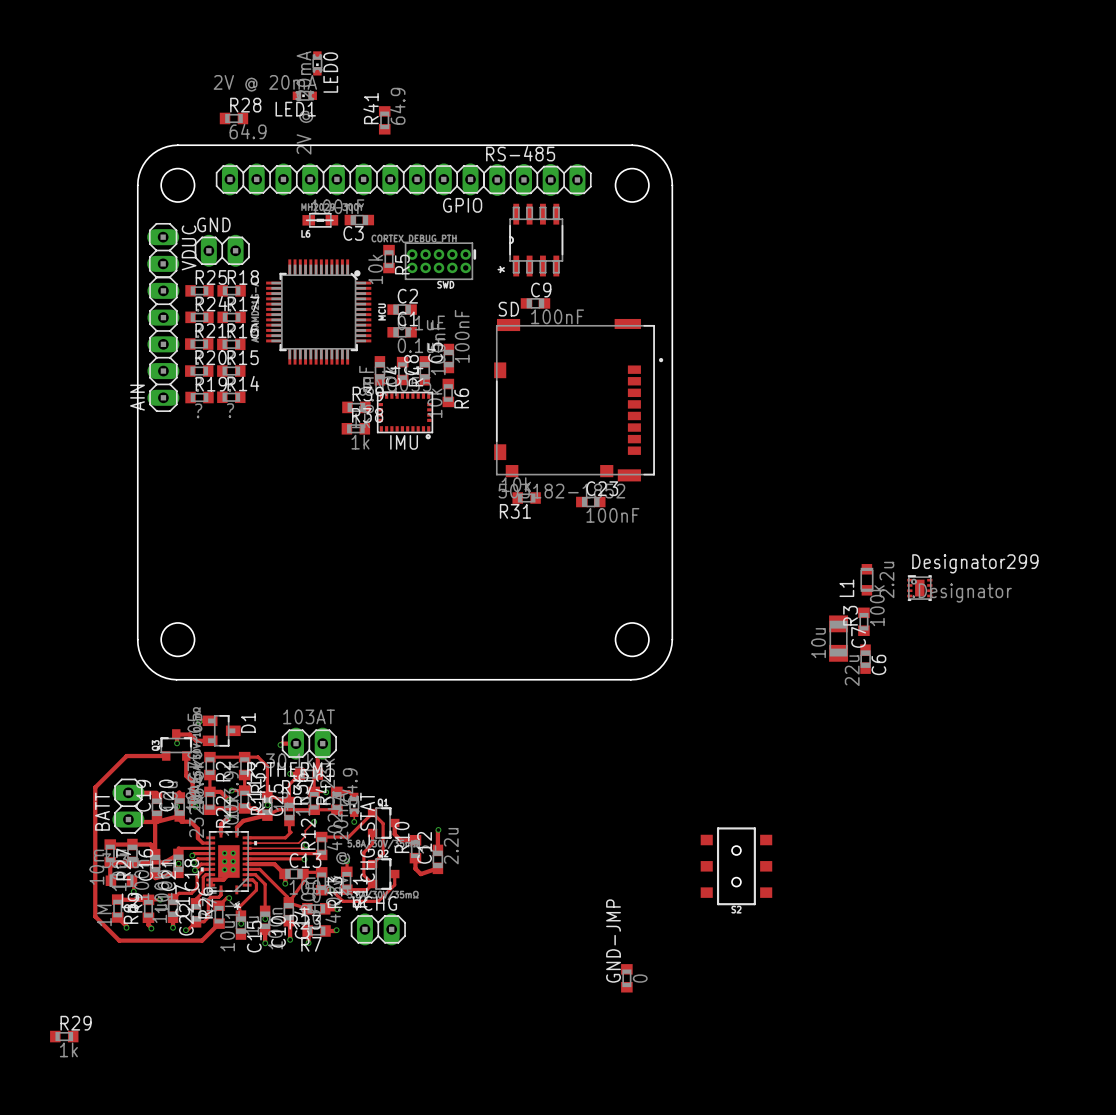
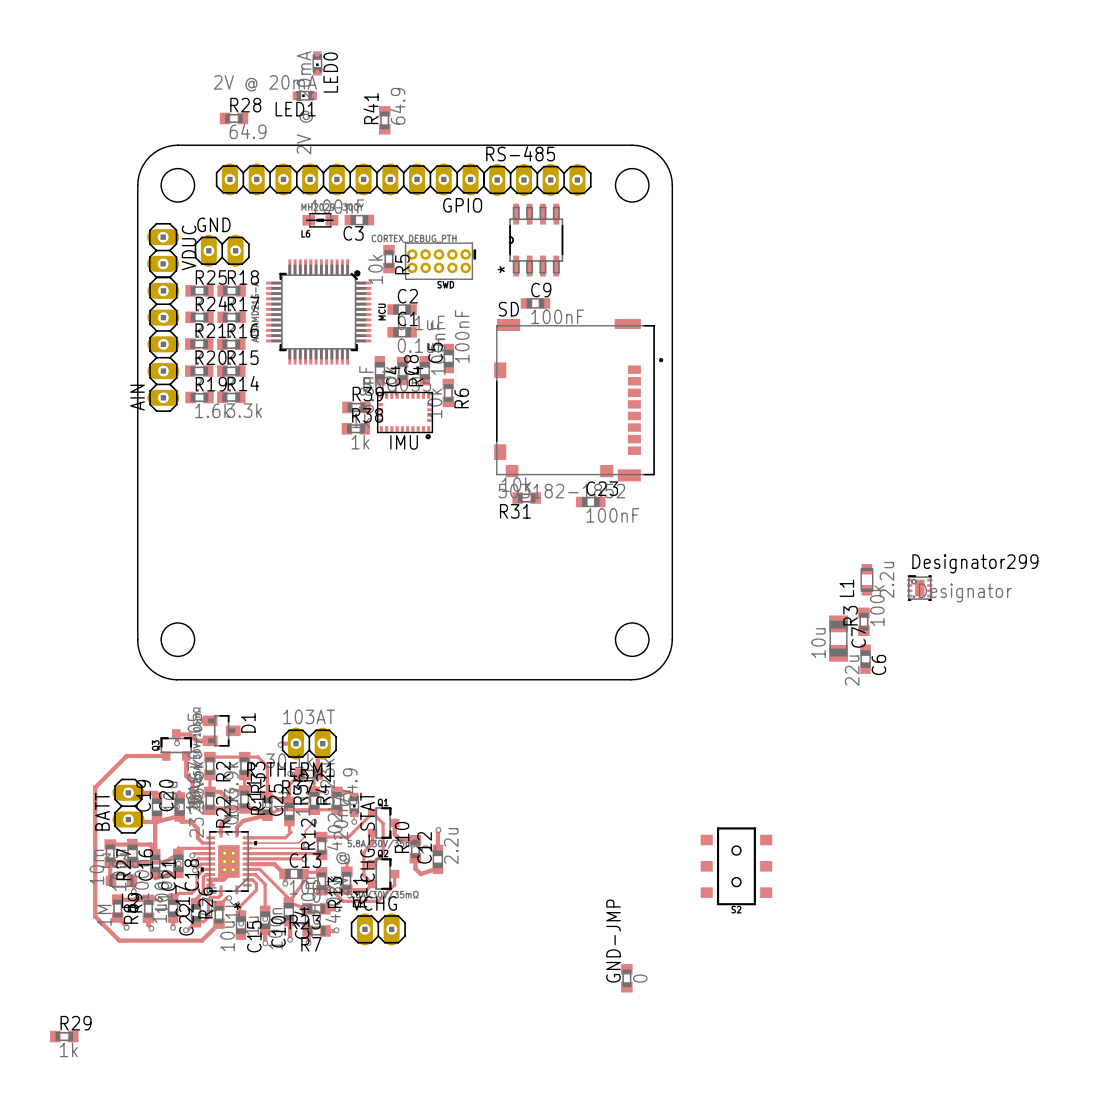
R19 value: ? (198, 410) -> 1.6k (212, 410)
R14 value: ? (230, 410) -> 3.3k (244, 410)

